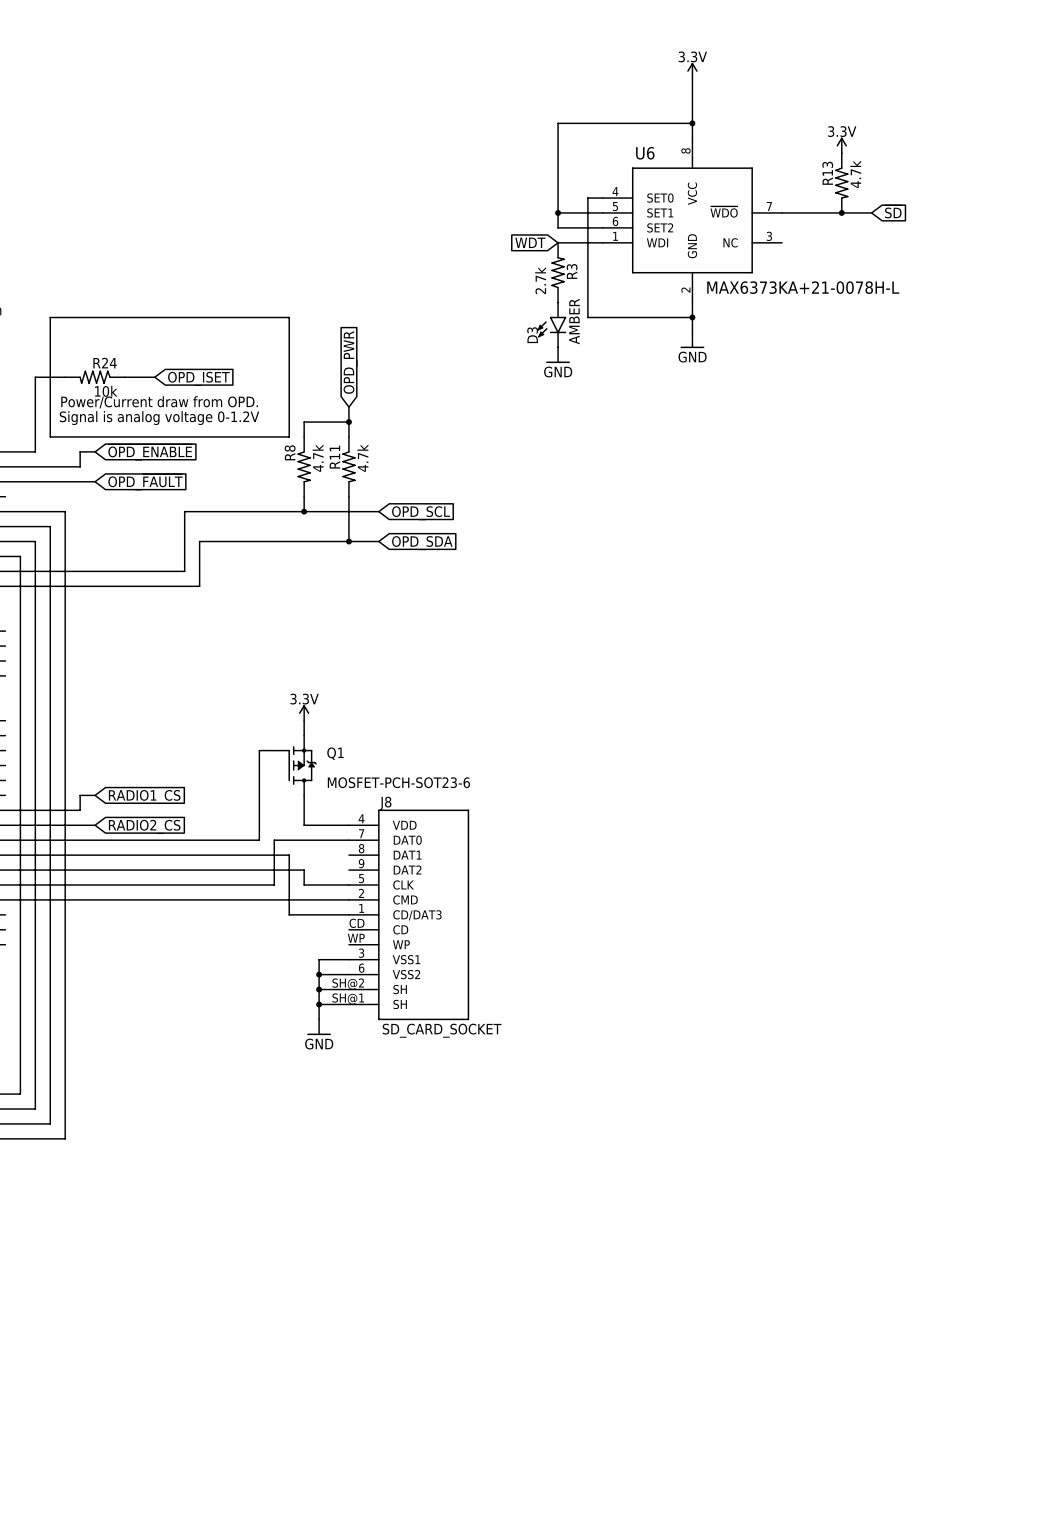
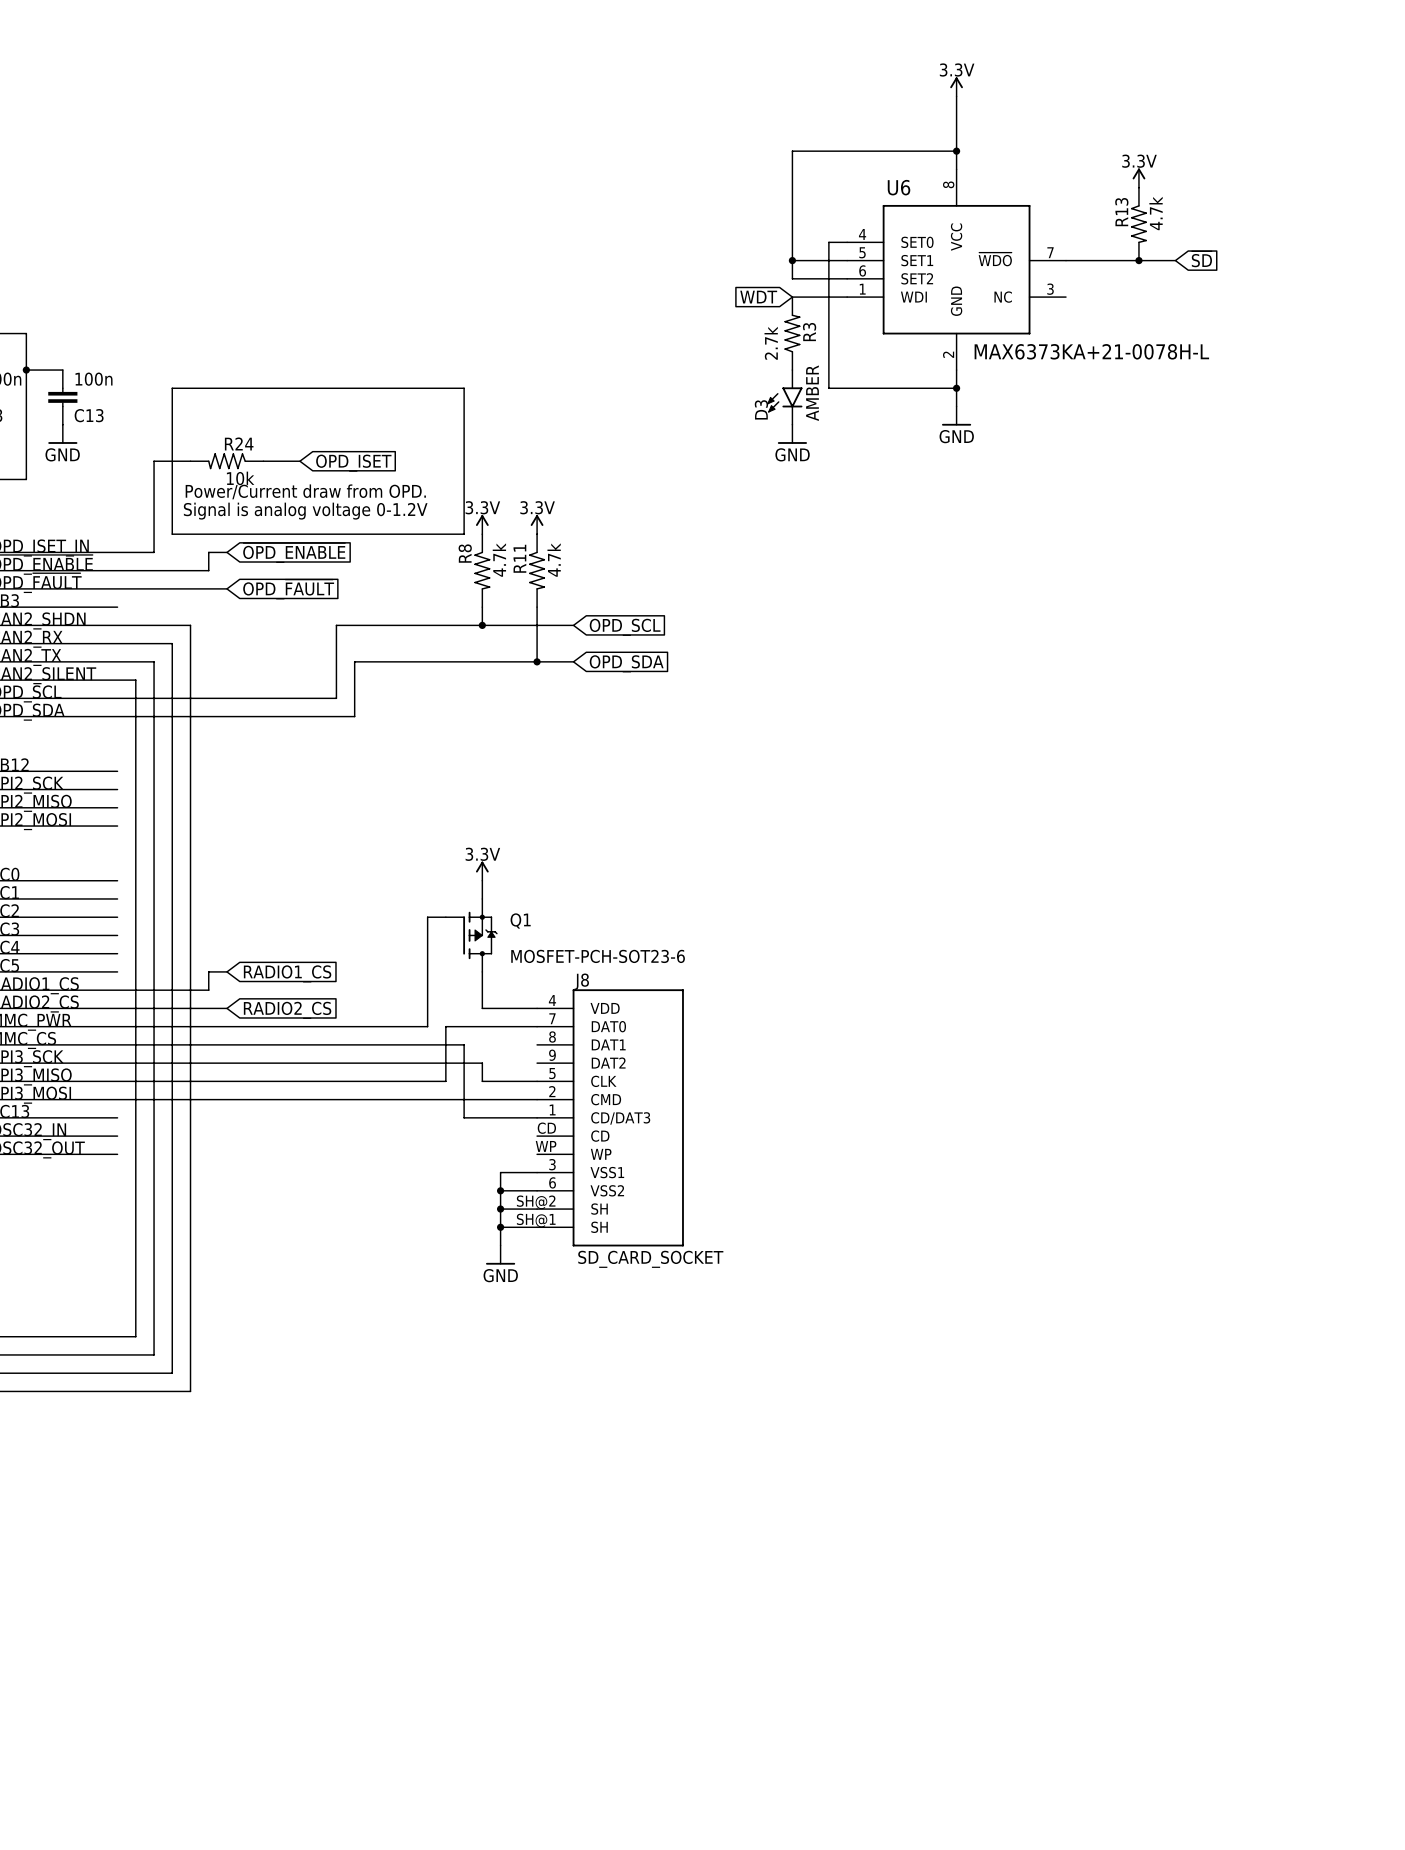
global label: OPD_PWR (350, 362) -> none
wire: (348, 422) (304, 422) (304, 436) -> none
junction: (348, 422) -> none
power symbol: none -> 3.3V (482, 524)
power symbol: none -> 3.3V (537, 524)

